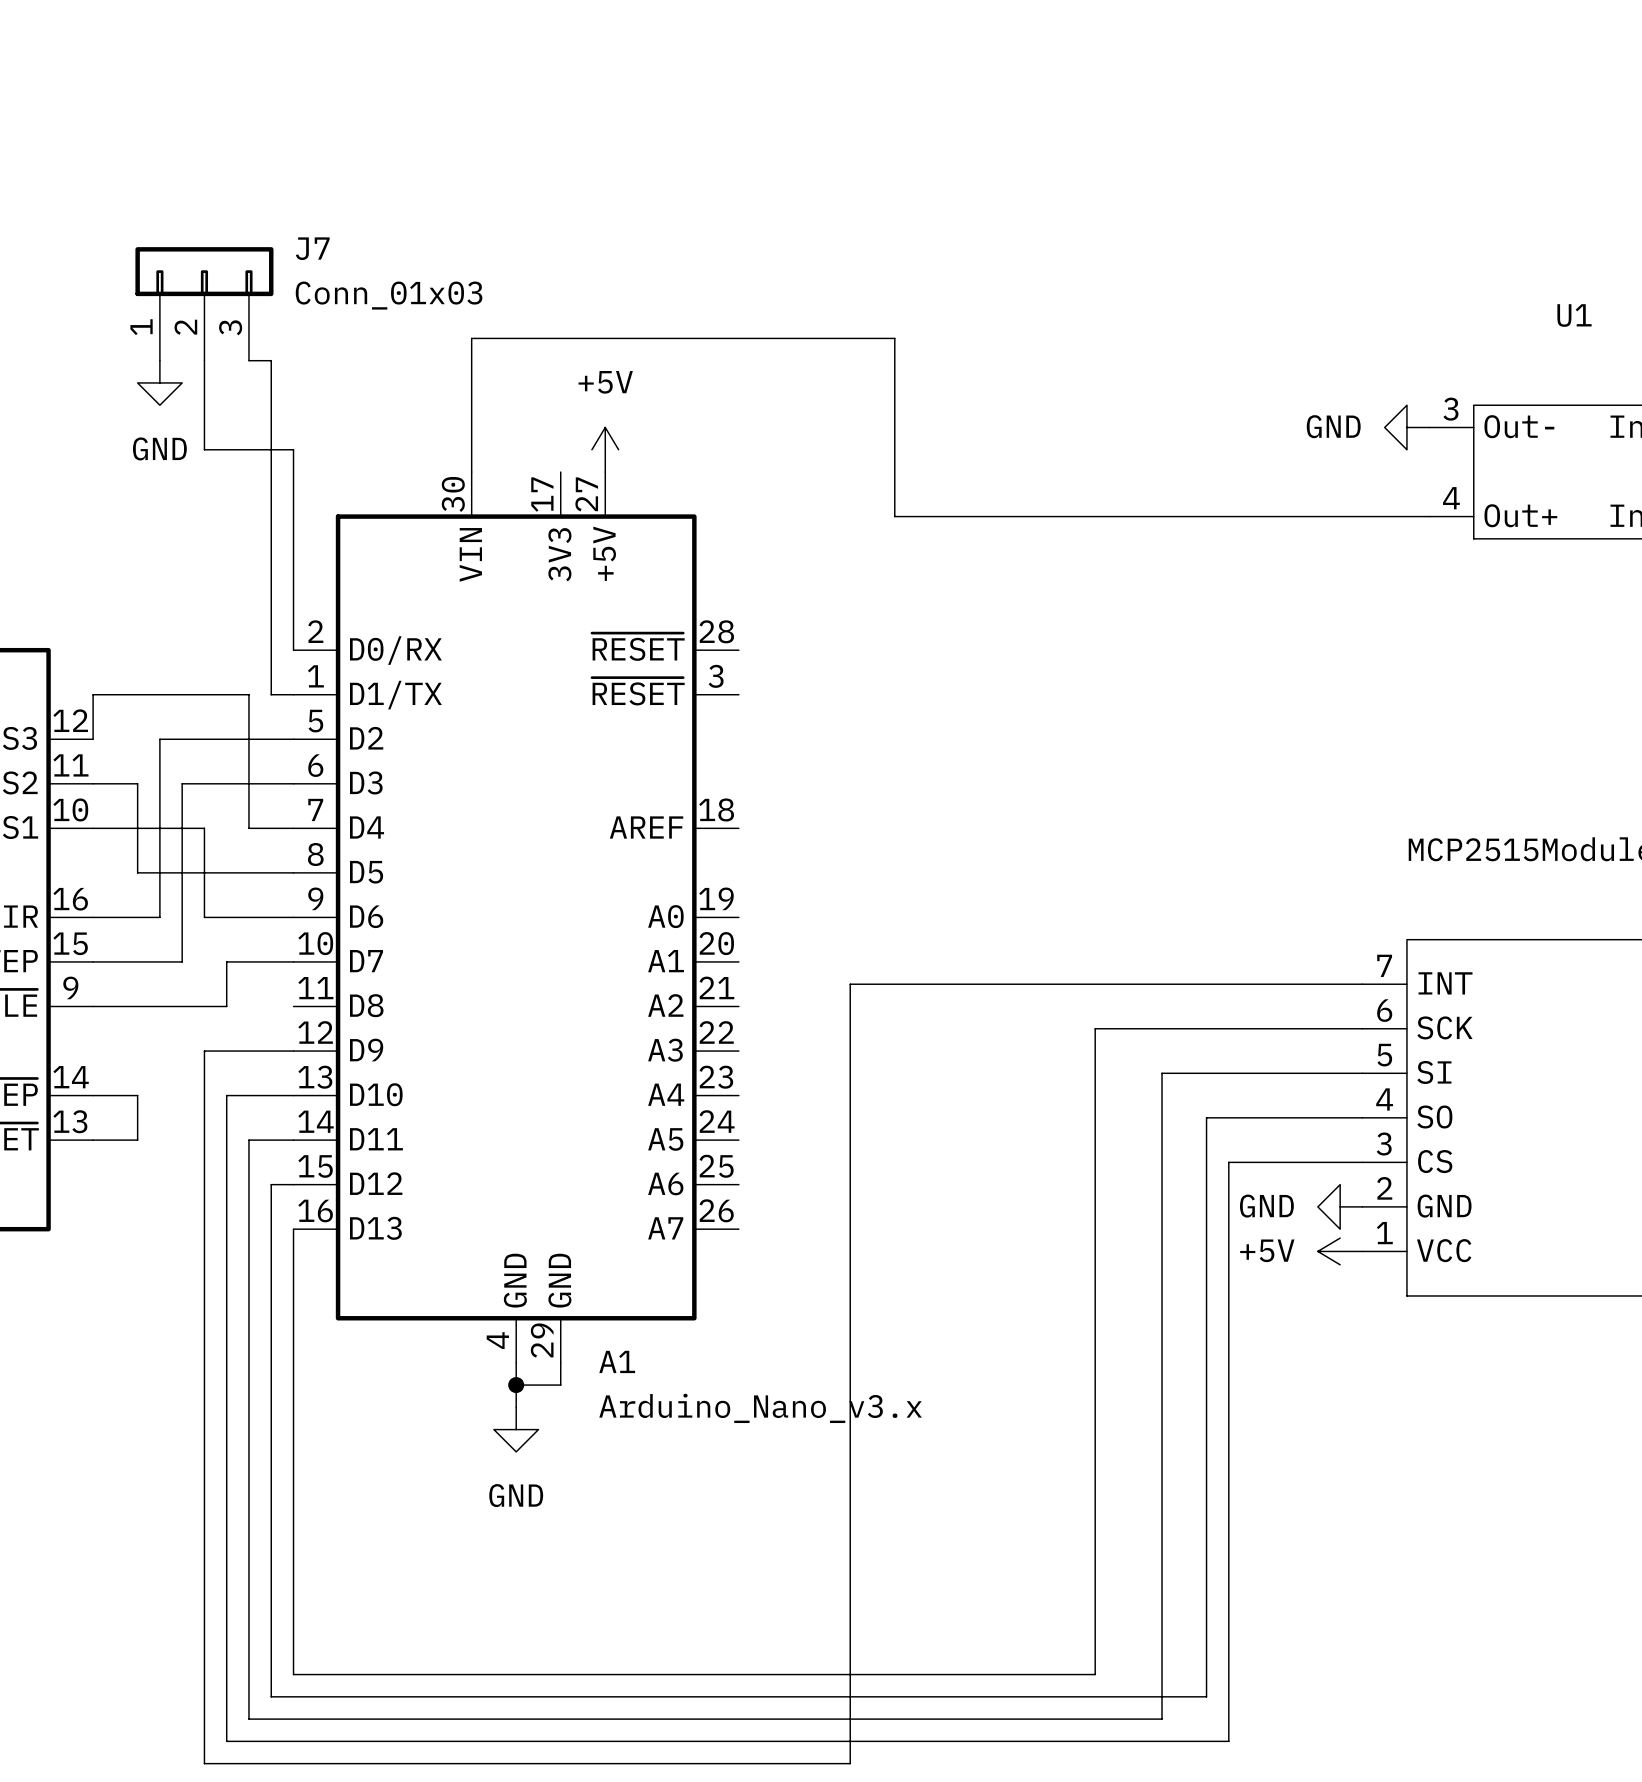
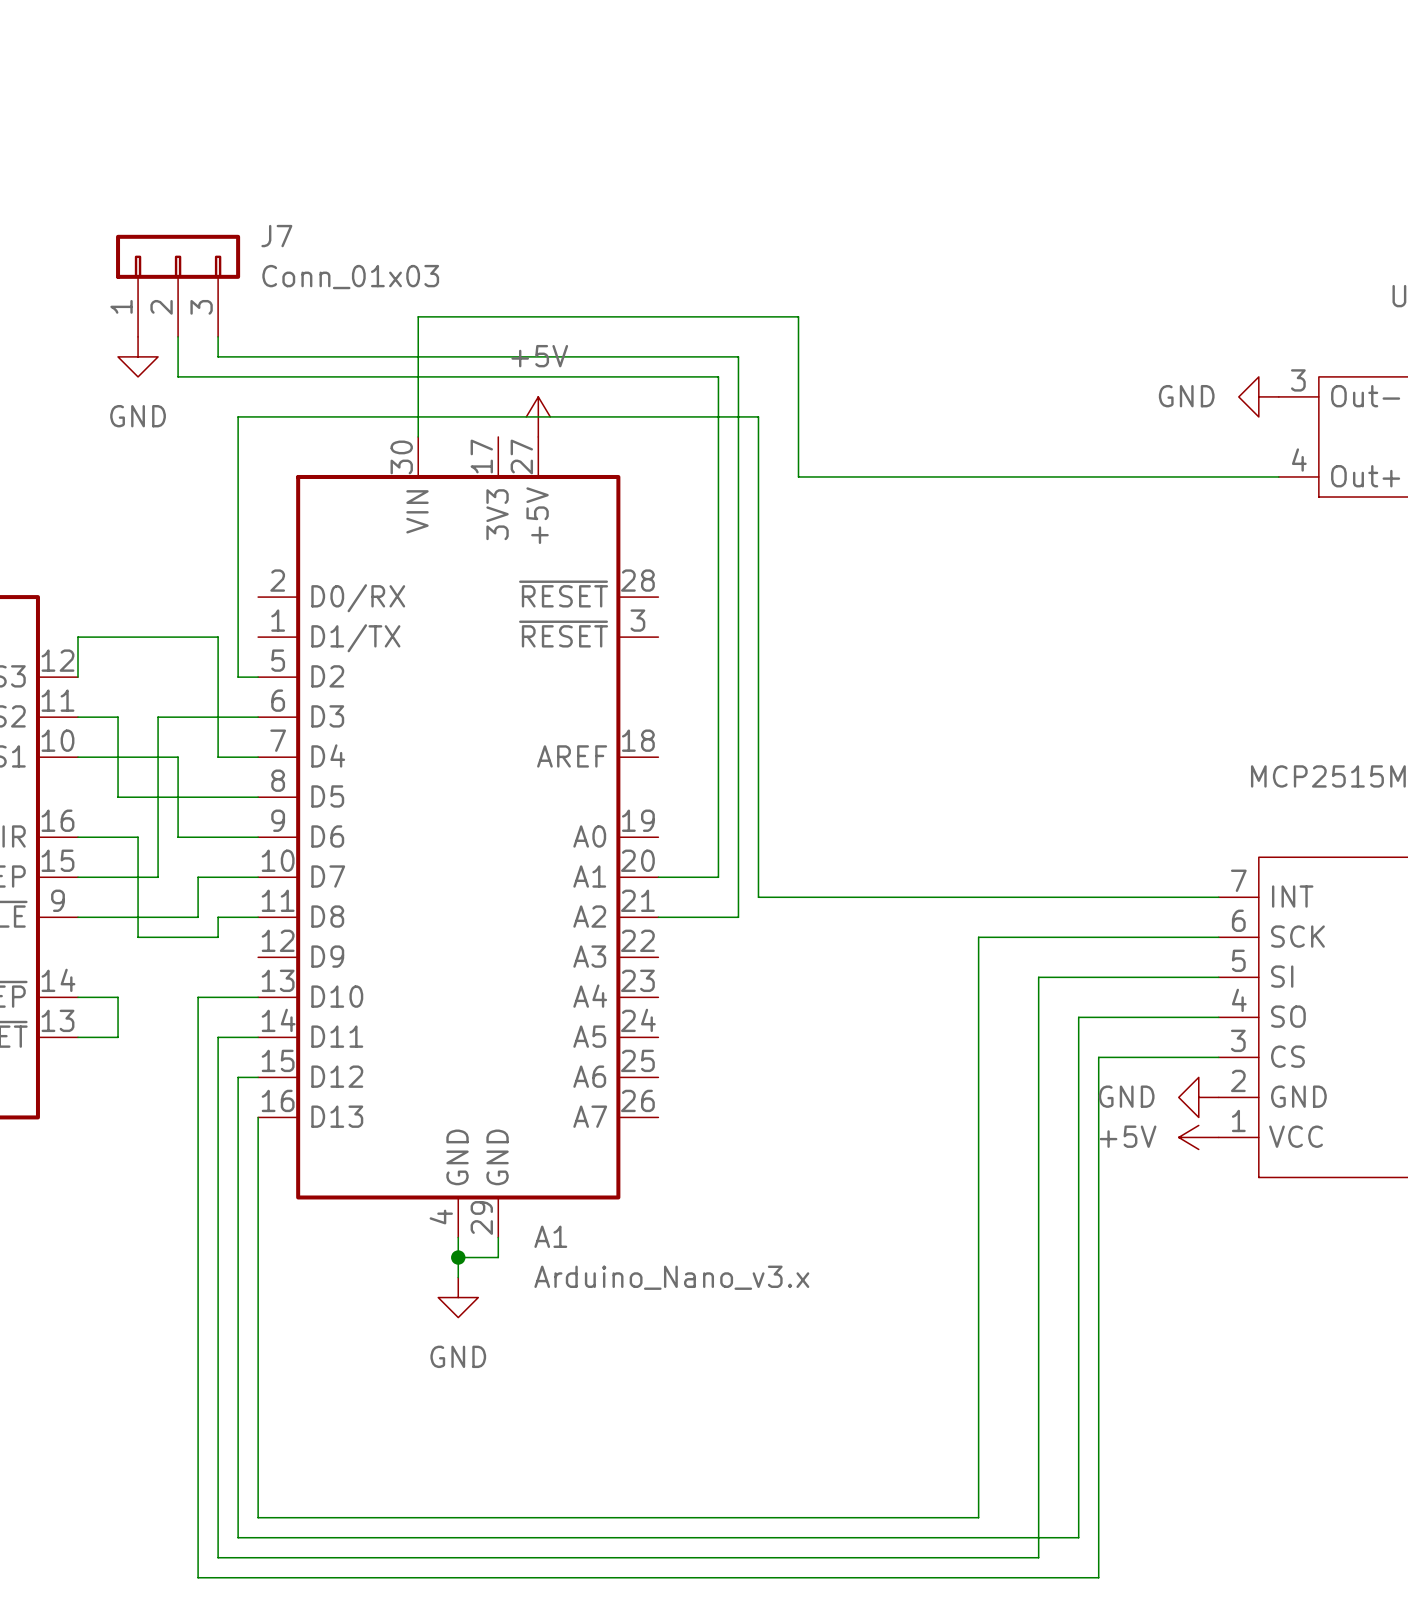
wire: (248, 360) (271, 360) (271, 449) (204, 449) (204, 405) -> (658, 877) (718, 877) (718, 376) (178, 376)
wire: none -> (218, 336) (218, 356) (738, 356) (738, 917) (658, 917)
wire: (293, 449) (293, 650) -> none
wire: (271, 694) (293, 694) -> (238, 637) (238, 677)
wire: (271, 739) (159, 739) (159, 917) -> (258, 917) (218, 917) (218, 937) (138, 937) (138, 837)
wire: (850, 984) (850, 1763) (204, 1763) (204, 1051) (293, 1051) -> (758, 897) (758, 416) (258, 416)

